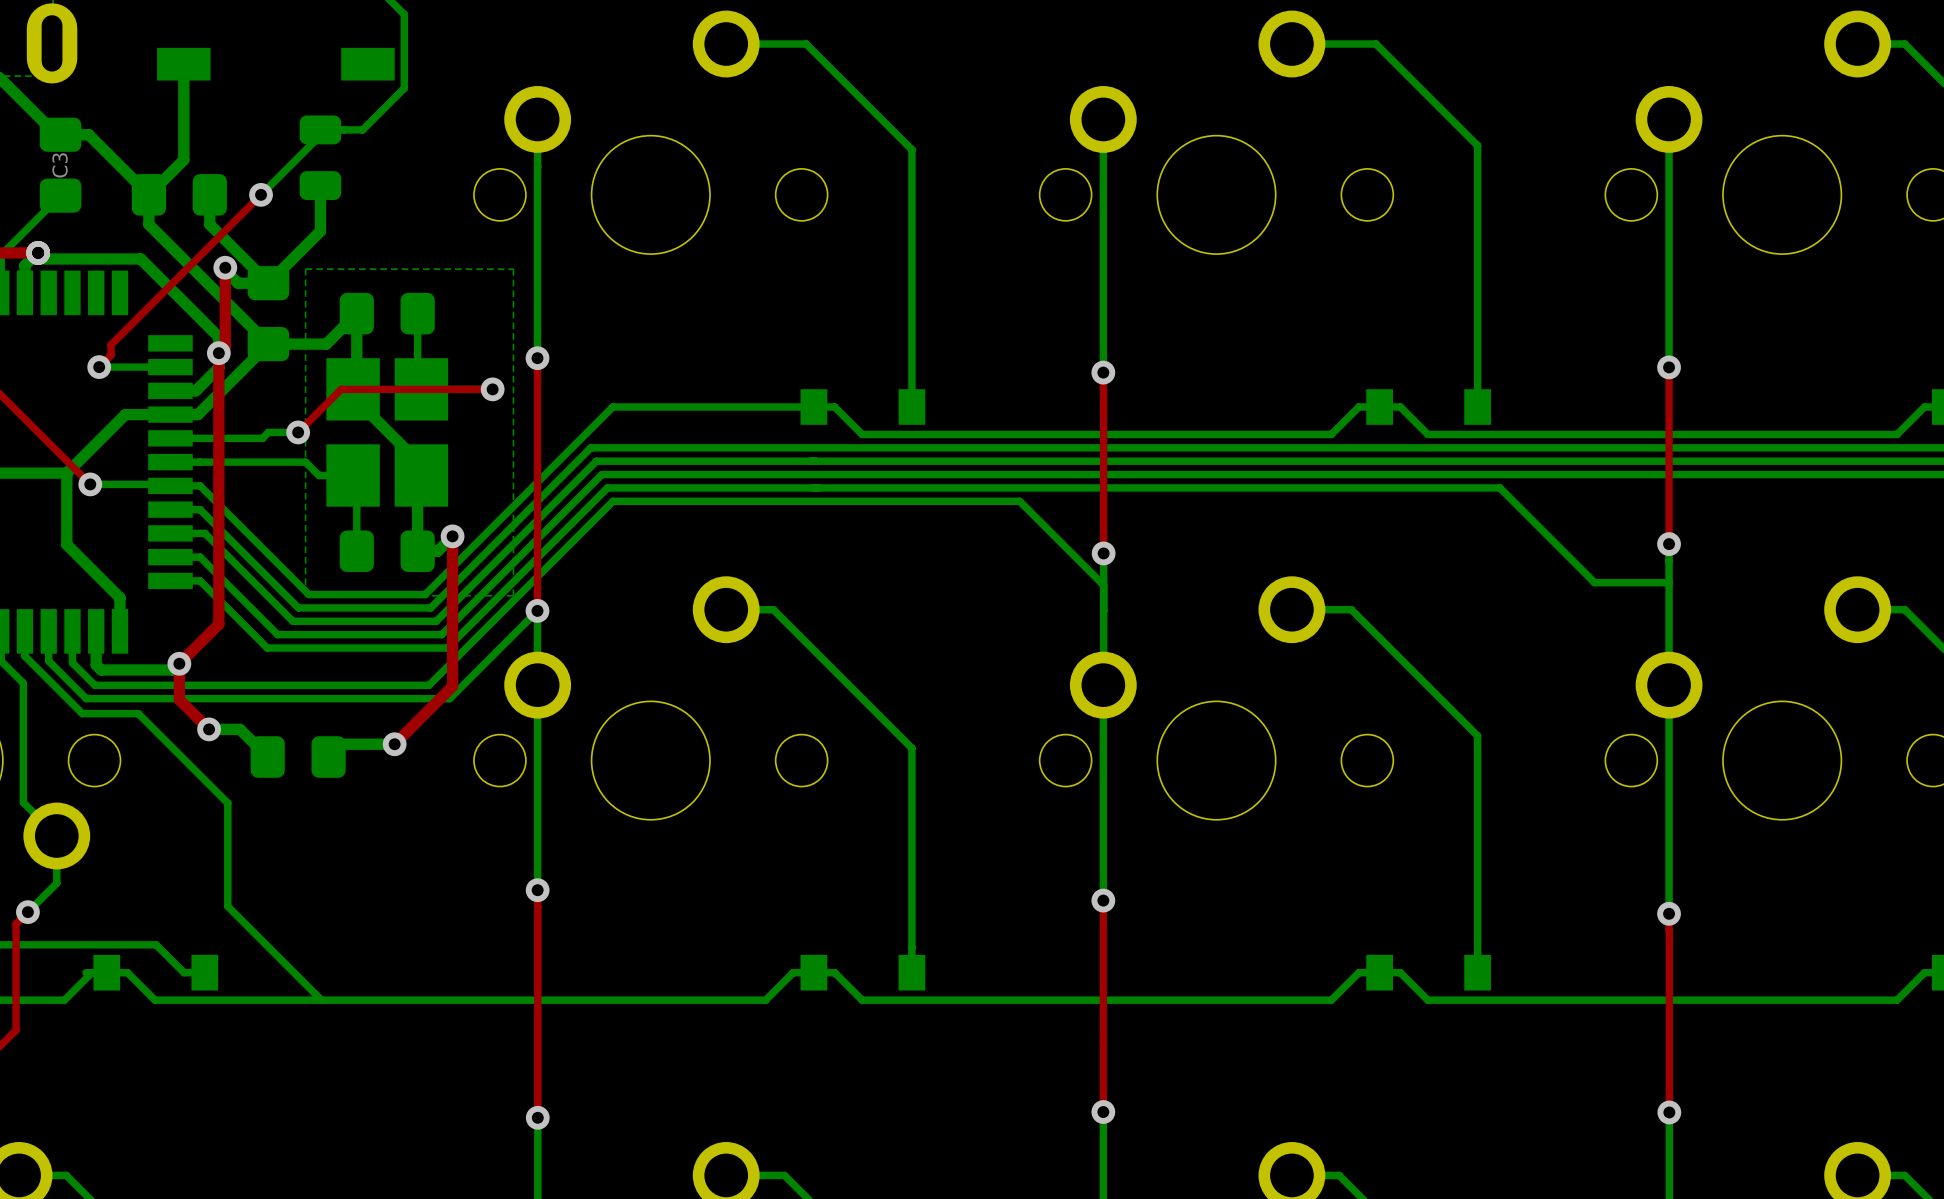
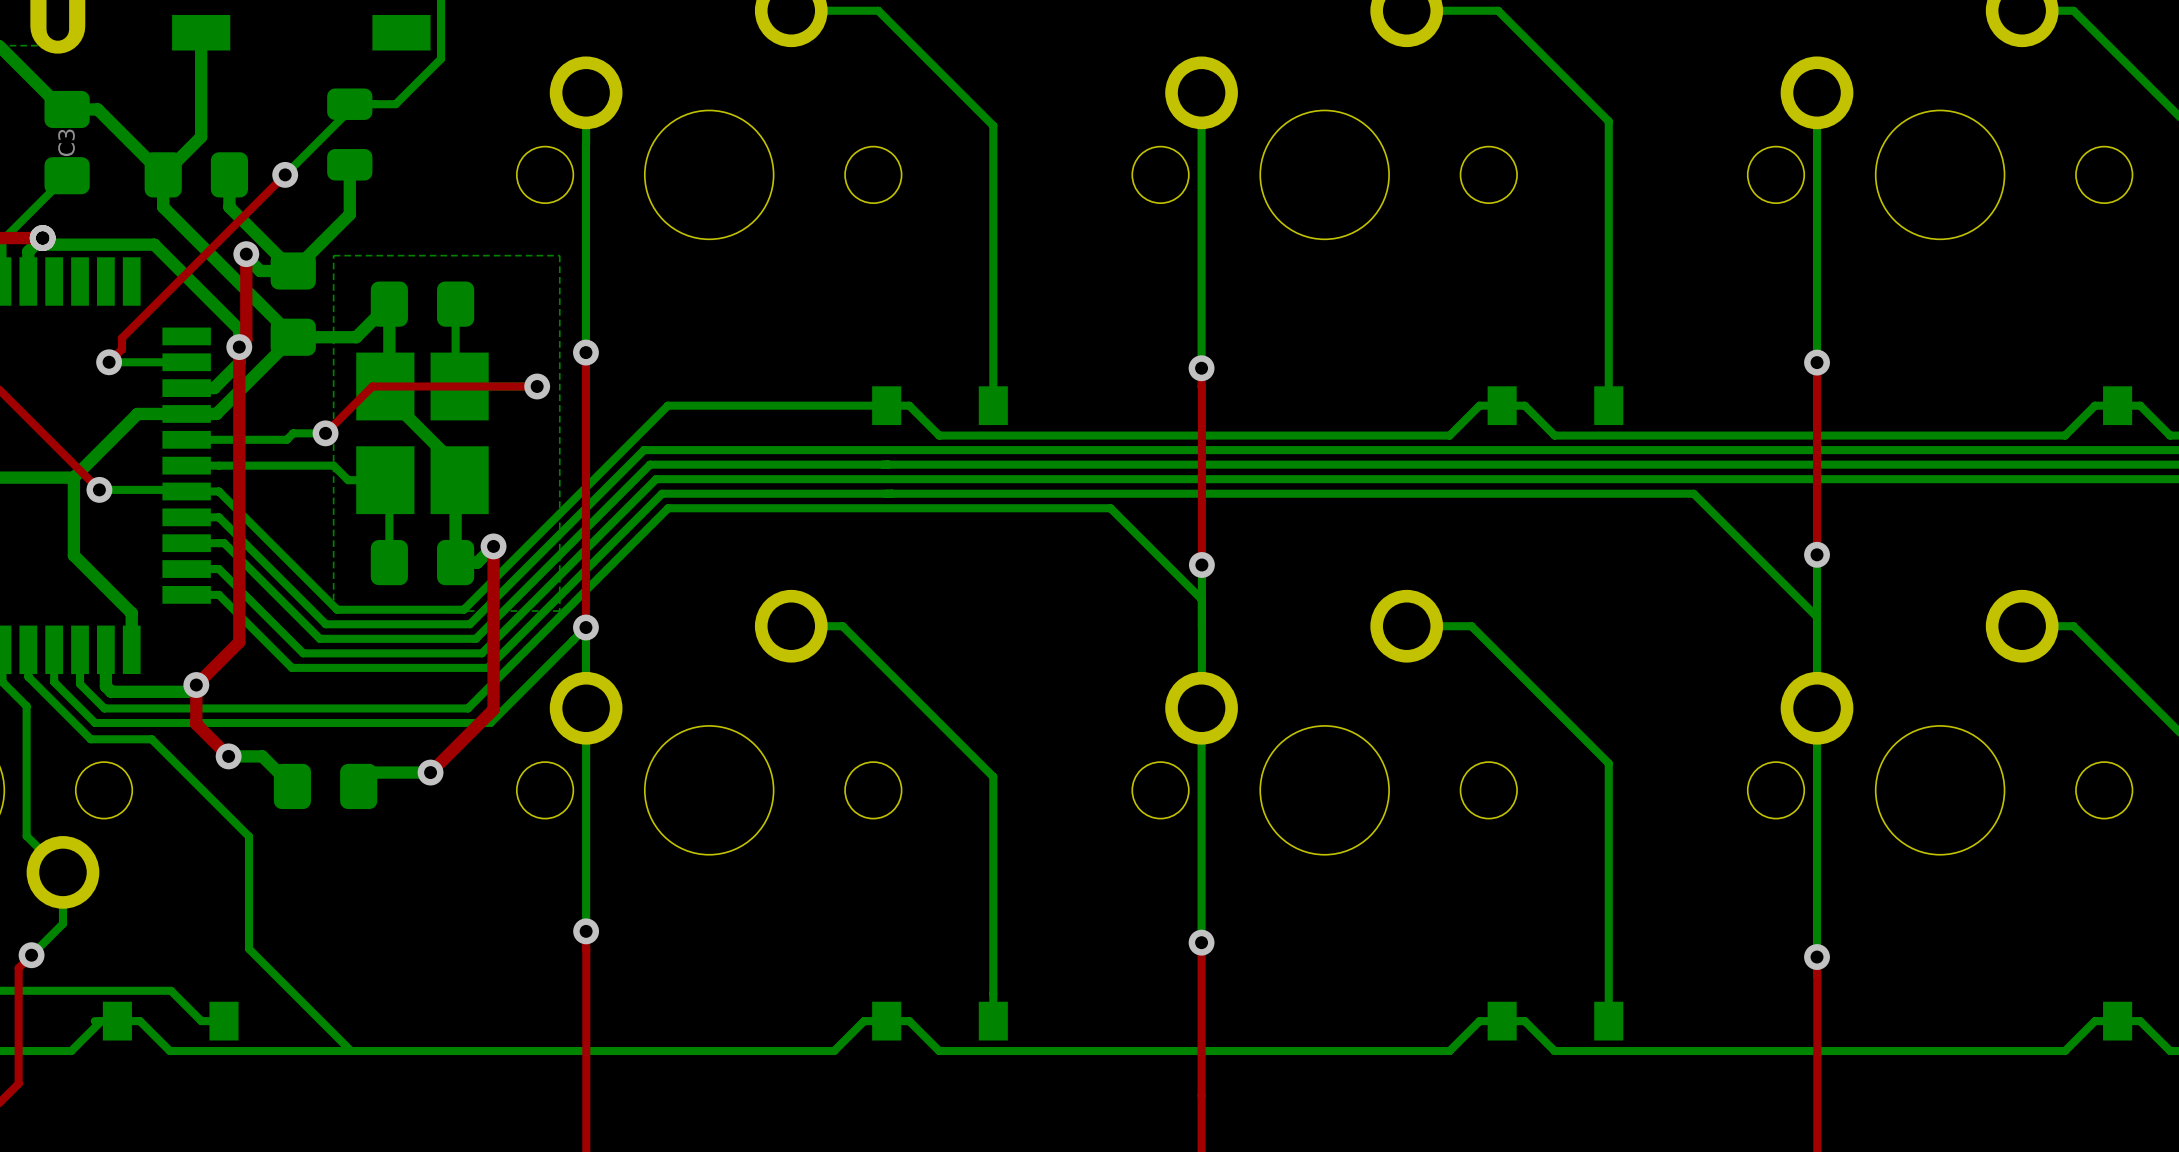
bottom track: (1499, 487) (1594, 582) (1669, 582) -> (1632, 493) (1693, 493) (1817, 617)

